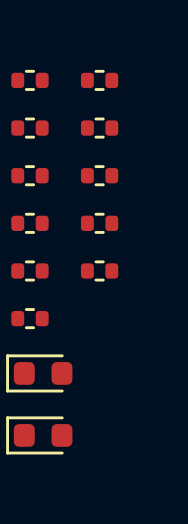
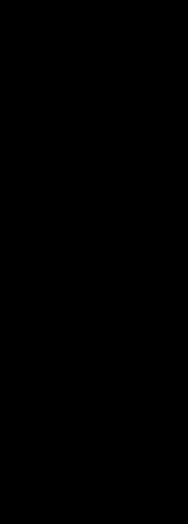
part: (29, 80) -> none
part: (99, 80) -> none
part: (29, 128) -> none
part: (99, 128) -> none
part: (29, 175) -> none
part: (99, 175) -> none
part: (29, 223) -> none
part: (99, 223) -> none
part: (29, 270) -> none
part: (99, 270) -> none
part: (29, 318) -> none
part: (39, 373) -> none
part: (39, 435) -> none

